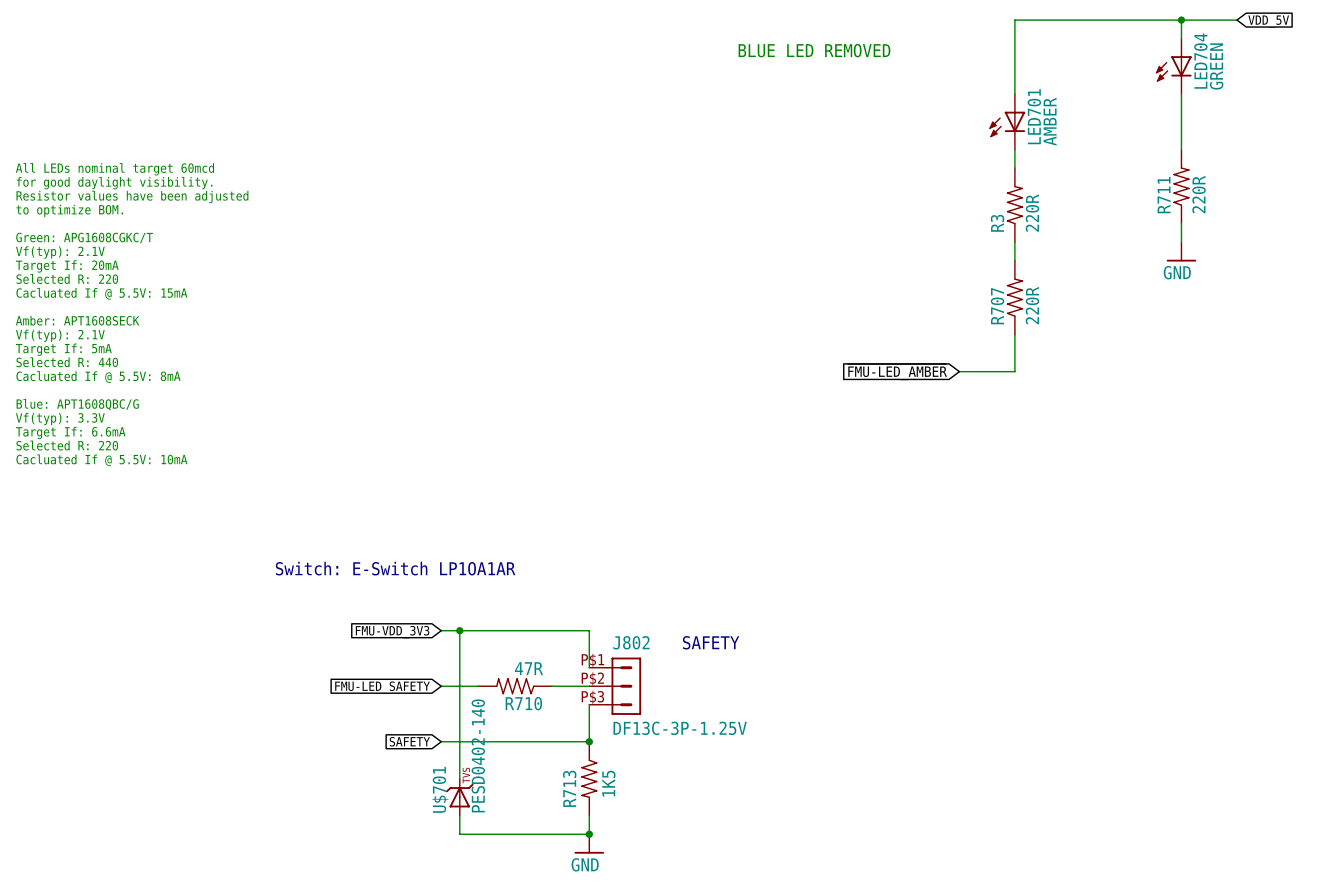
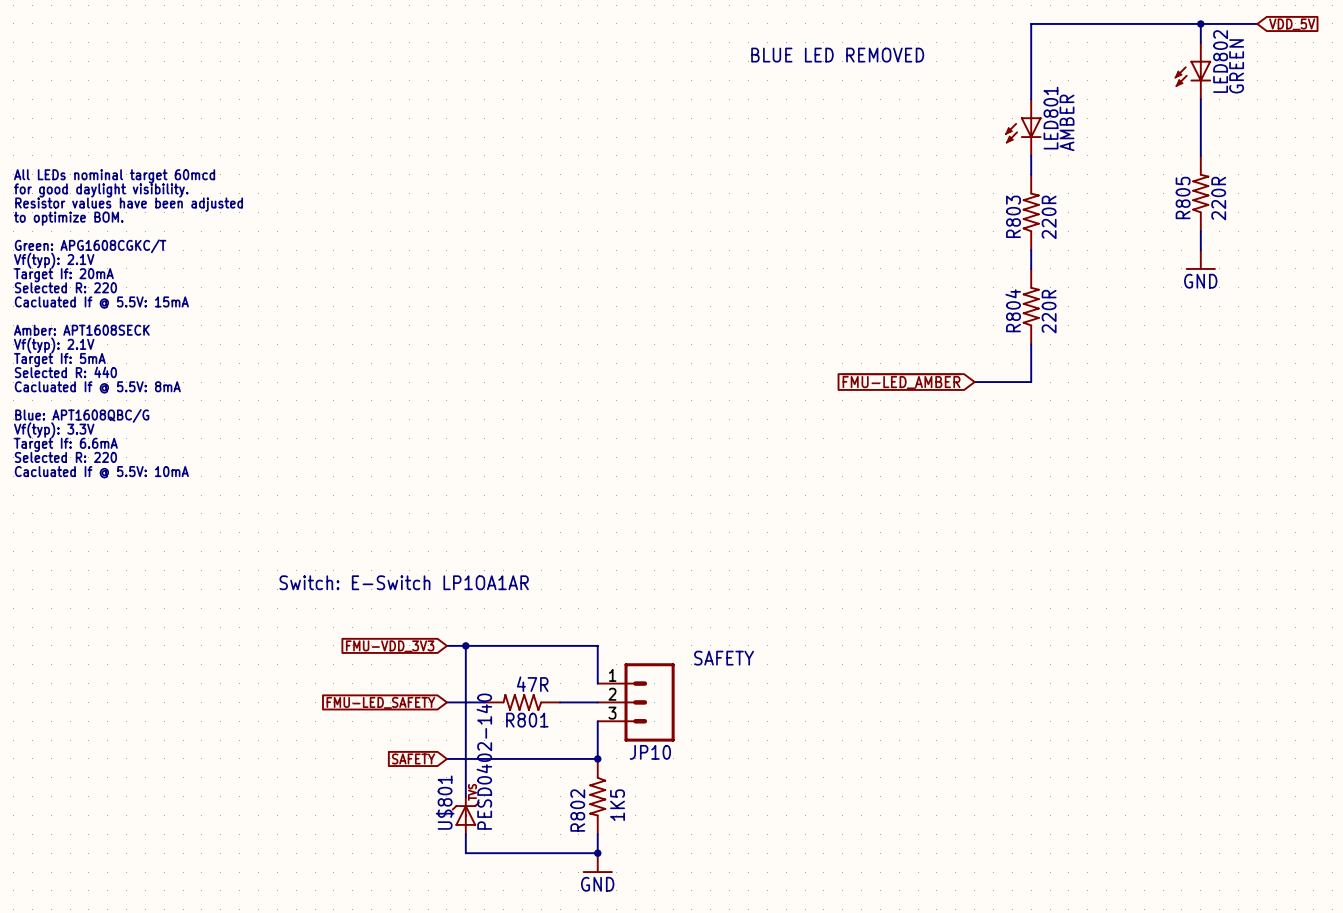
LED704 name: LED704 (1200, 61) -> LED802 (1220, 61)
LED701 name: LED701 (1034, 116) -> LED801 (1050, 118)
R711 name: R711 (1164, 195) -> R805 (1183, 197)
R3 name: R3 (997, 223) -> R803 (1013, 216)
R707 name: R707 (997, 306) -> R804 (1013, 310)
J802: DF13C-3P-1.25V (615, 686) -> none
JP10: none -> (636, 702)
R710 name: R710 (523, 703) -> R801 (527, 720)
R713 name: R713 (569, 788) -> R802 (577, 810)
U$701 name: U$701 (440, 789) -> U$801 (445, 802)

